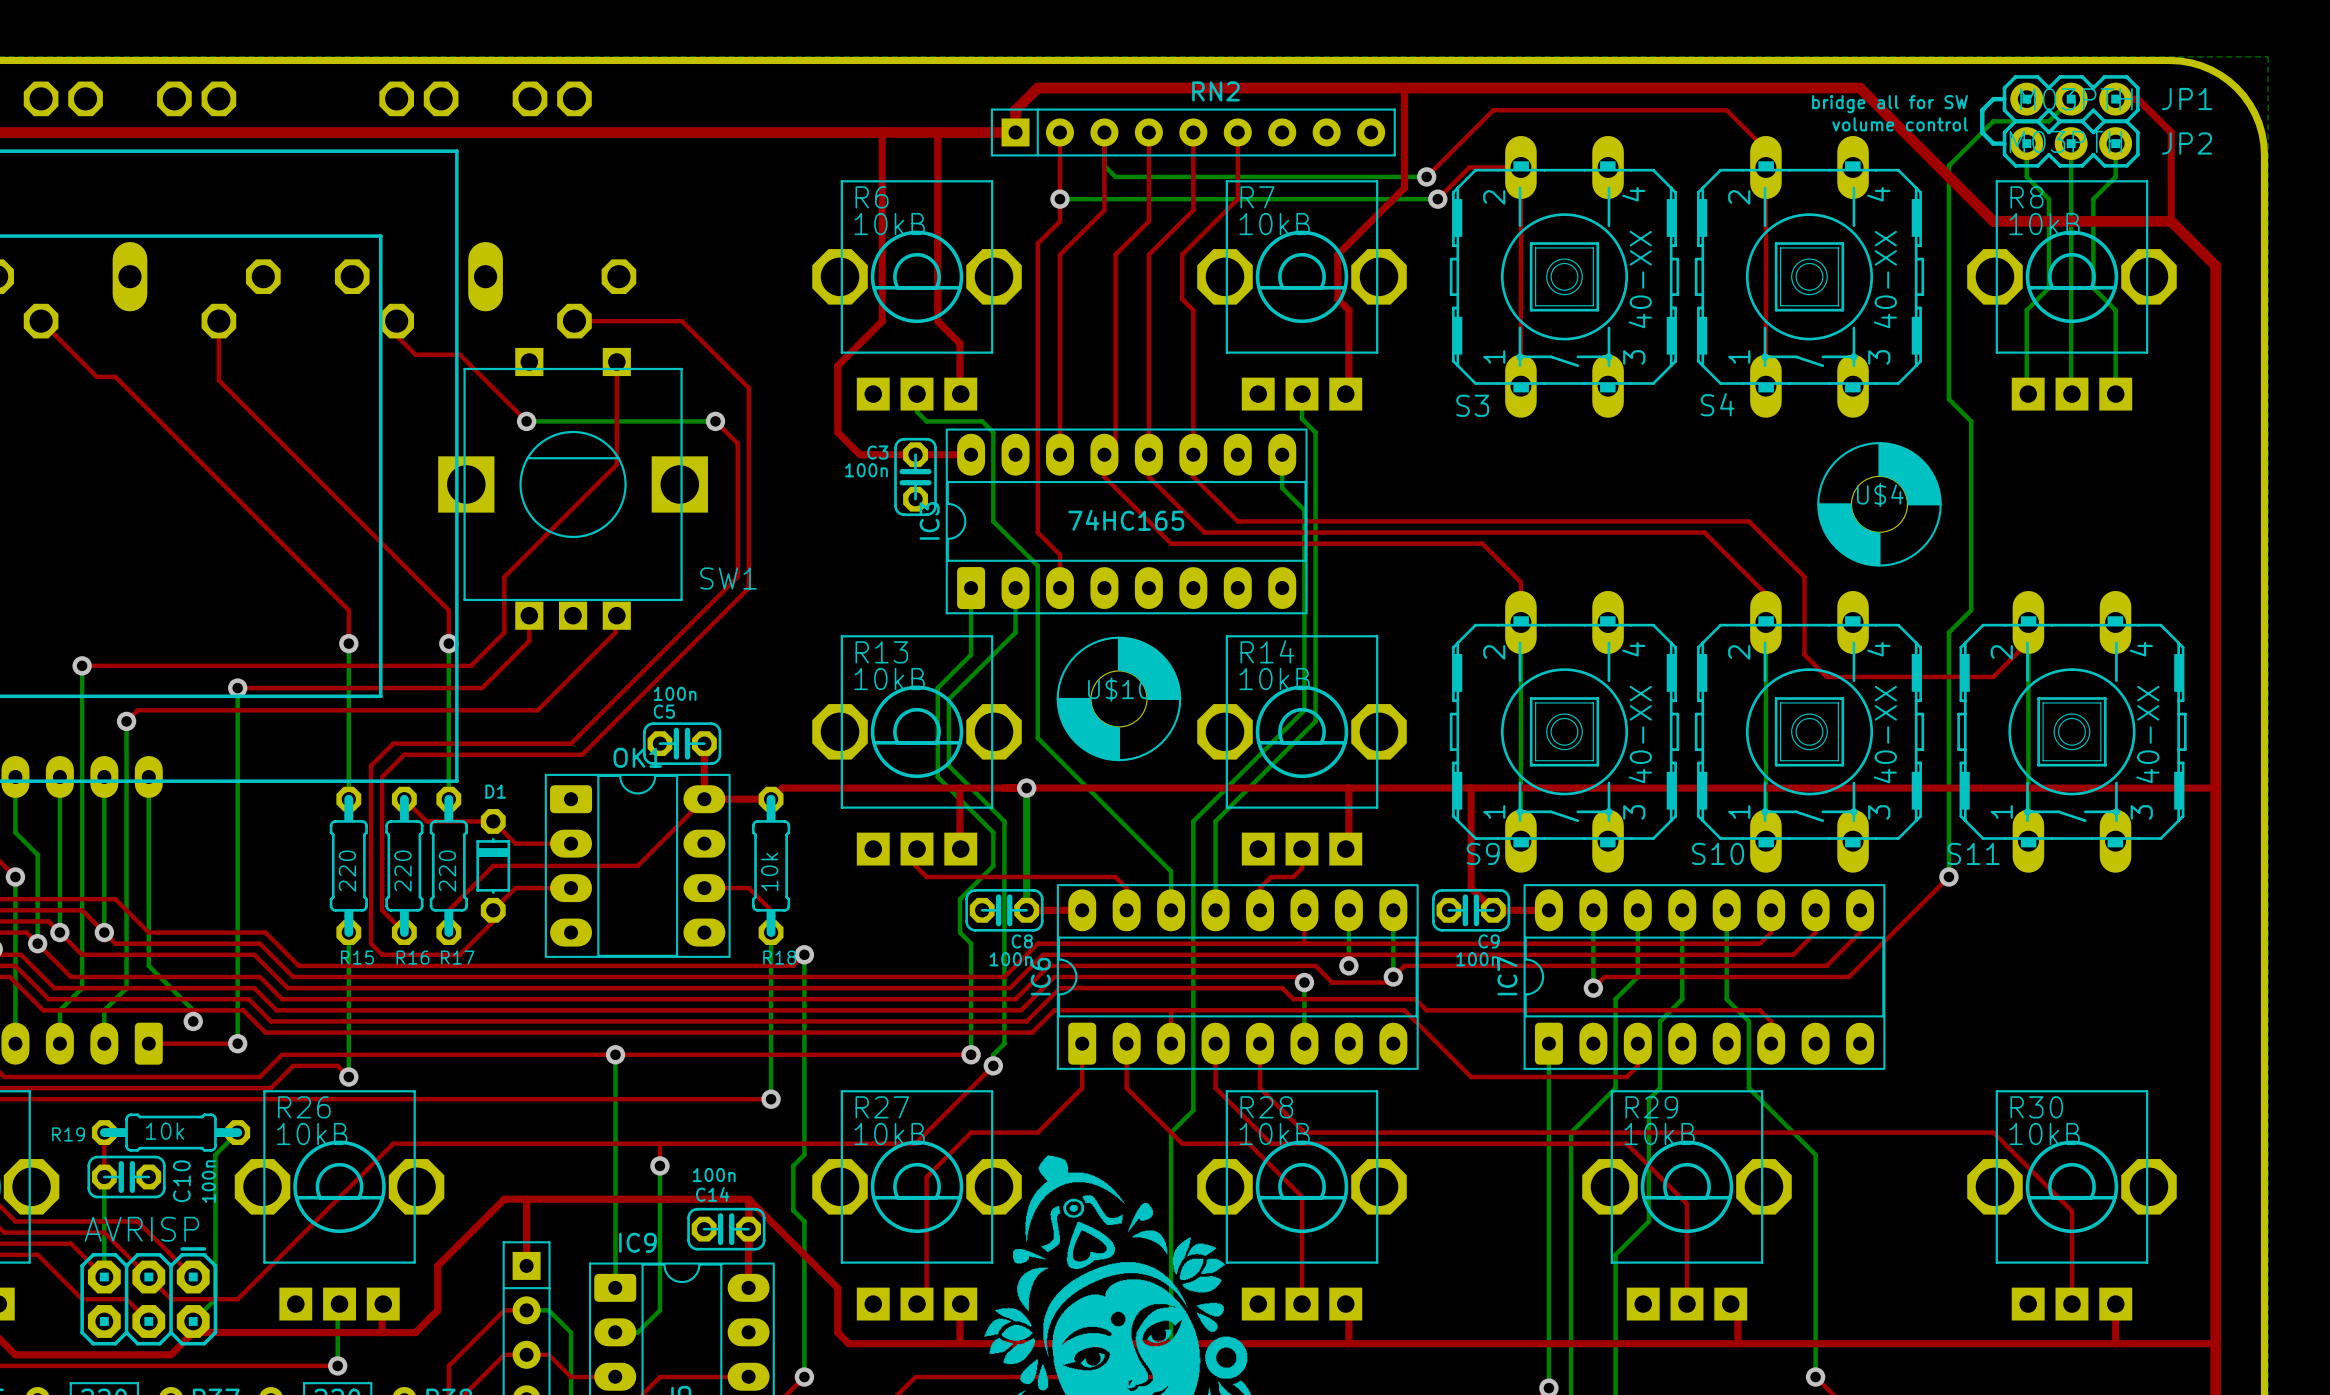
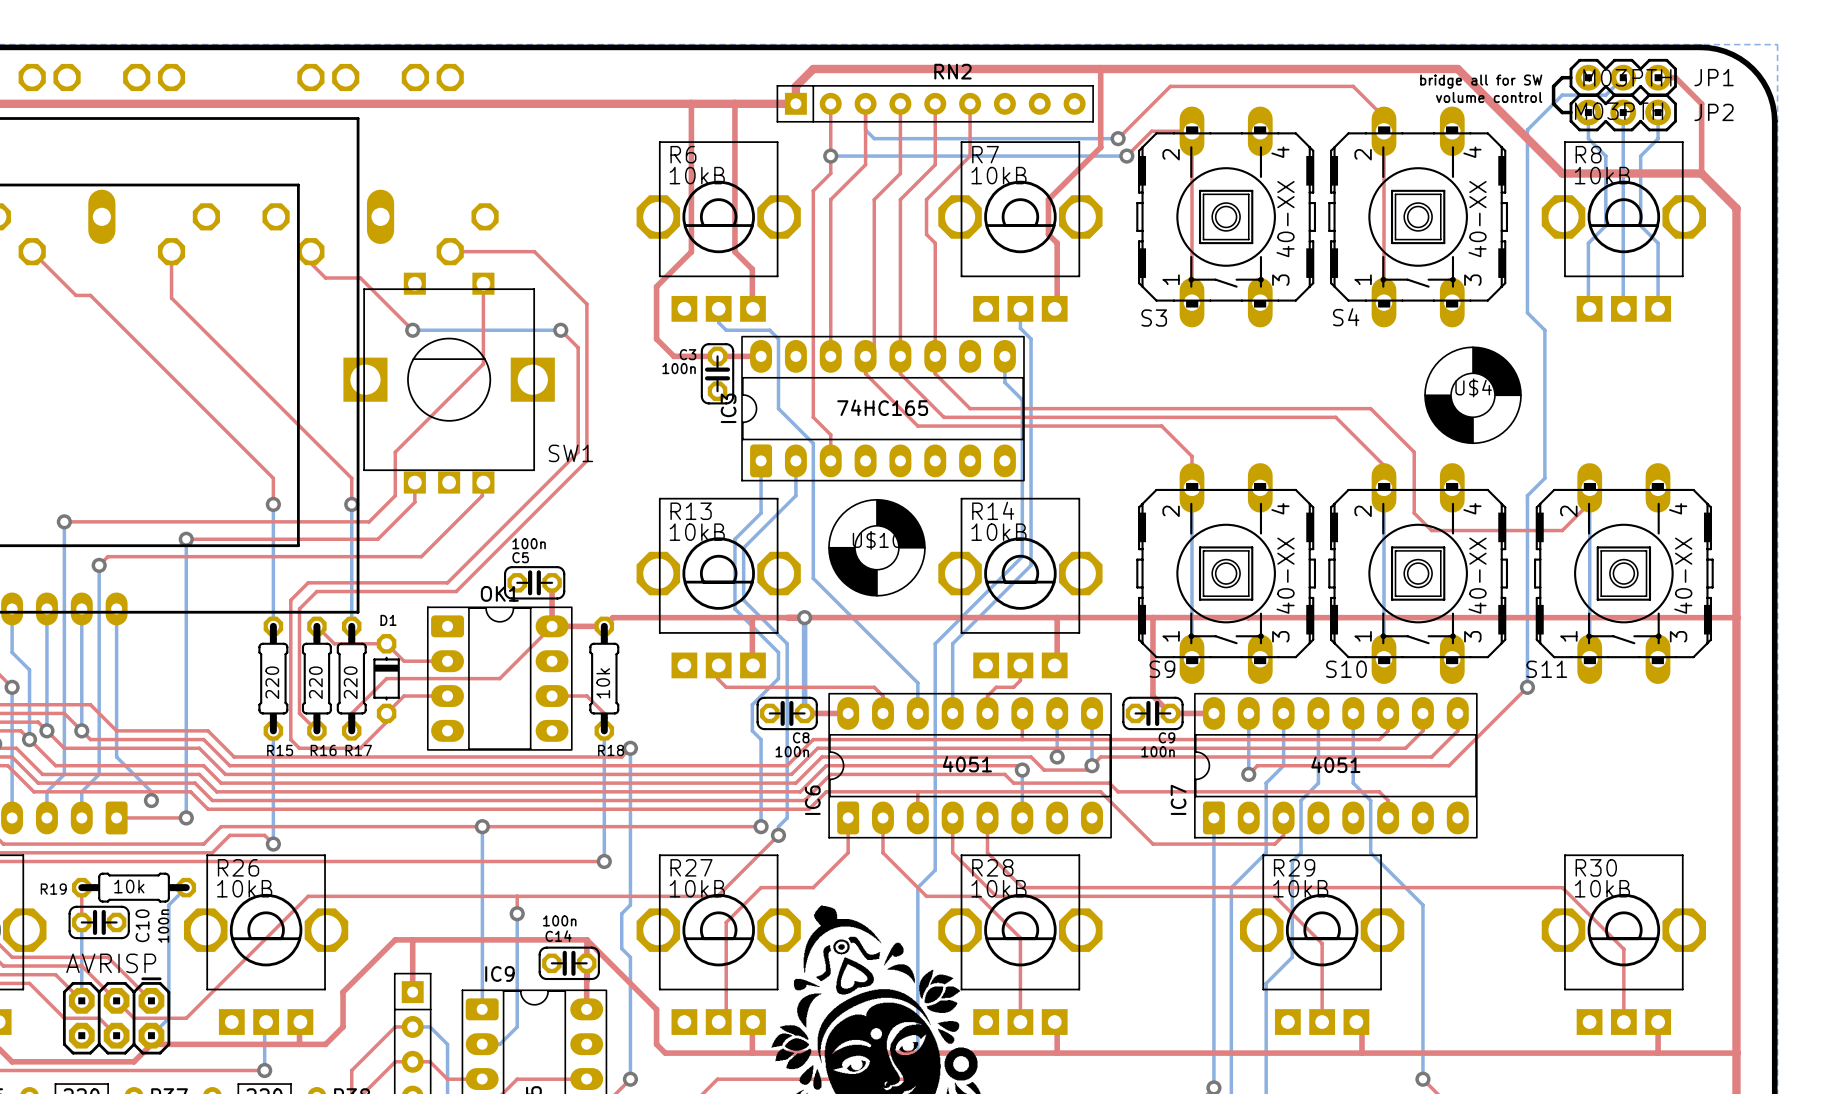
IC6 value: none -> 4051 (967, 764)
IC7 value: none -> 4051 (1335, 764)
IC6 name position: IC6 (1040, 976) -> IC6 (812, 800)
IC7 name position: IC7 (1507, 976) -> IC7 (1178, 799)

